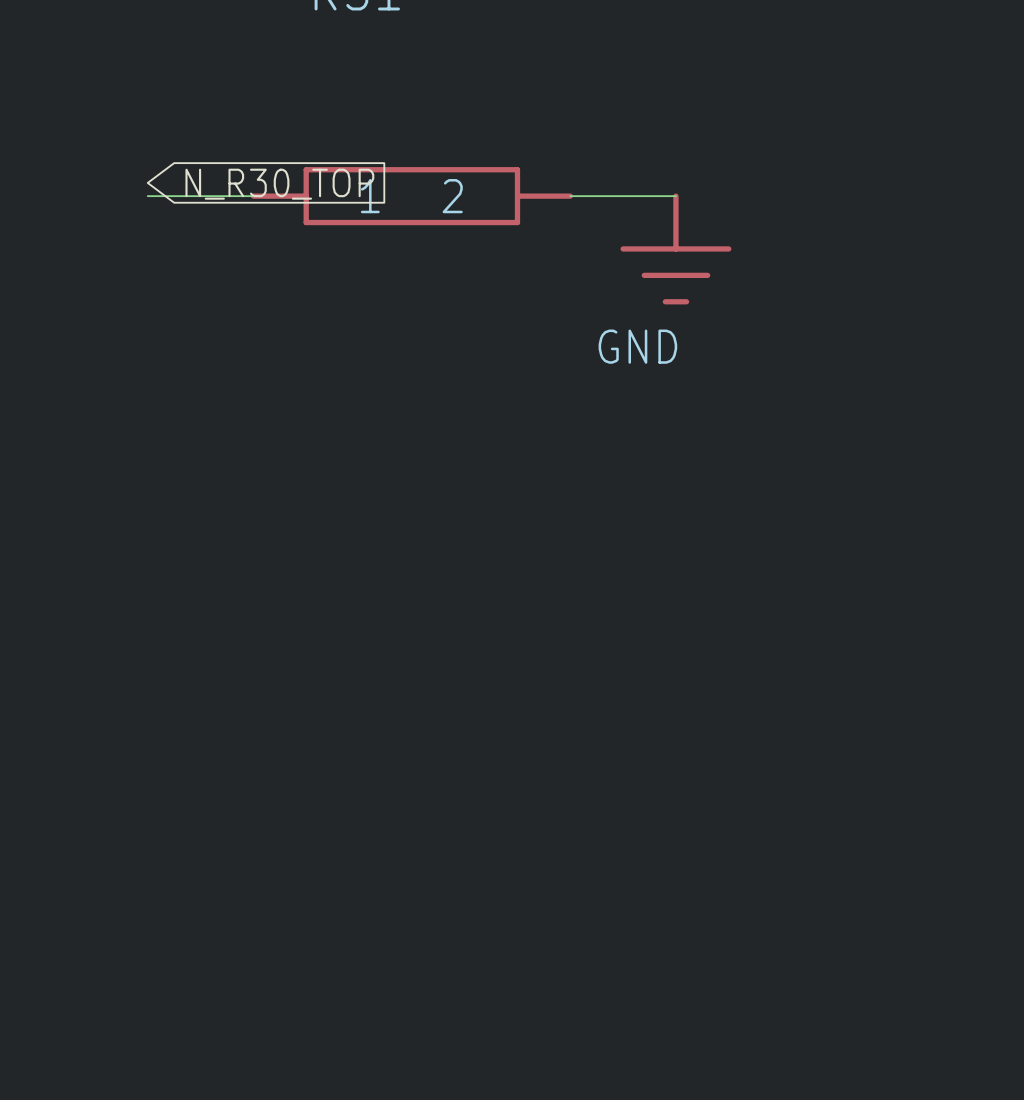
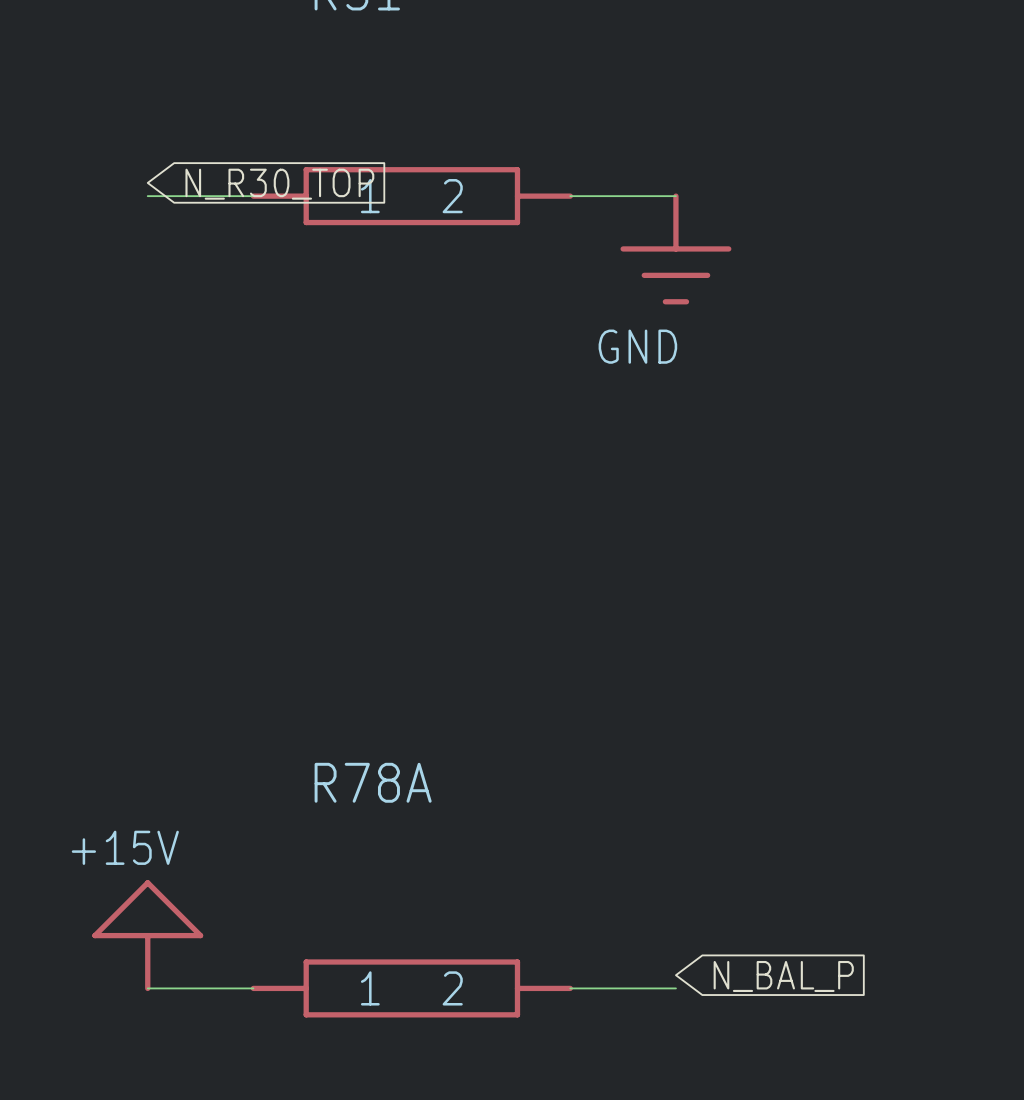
power symbol: none -> (147, 935)
global label: none -> N_BAL_P (783, 976)
wire: none -> (147, 988) (253, 988)
R78A: none -> (411, 988)
wire: none -> (570, 988) (675, 988)

